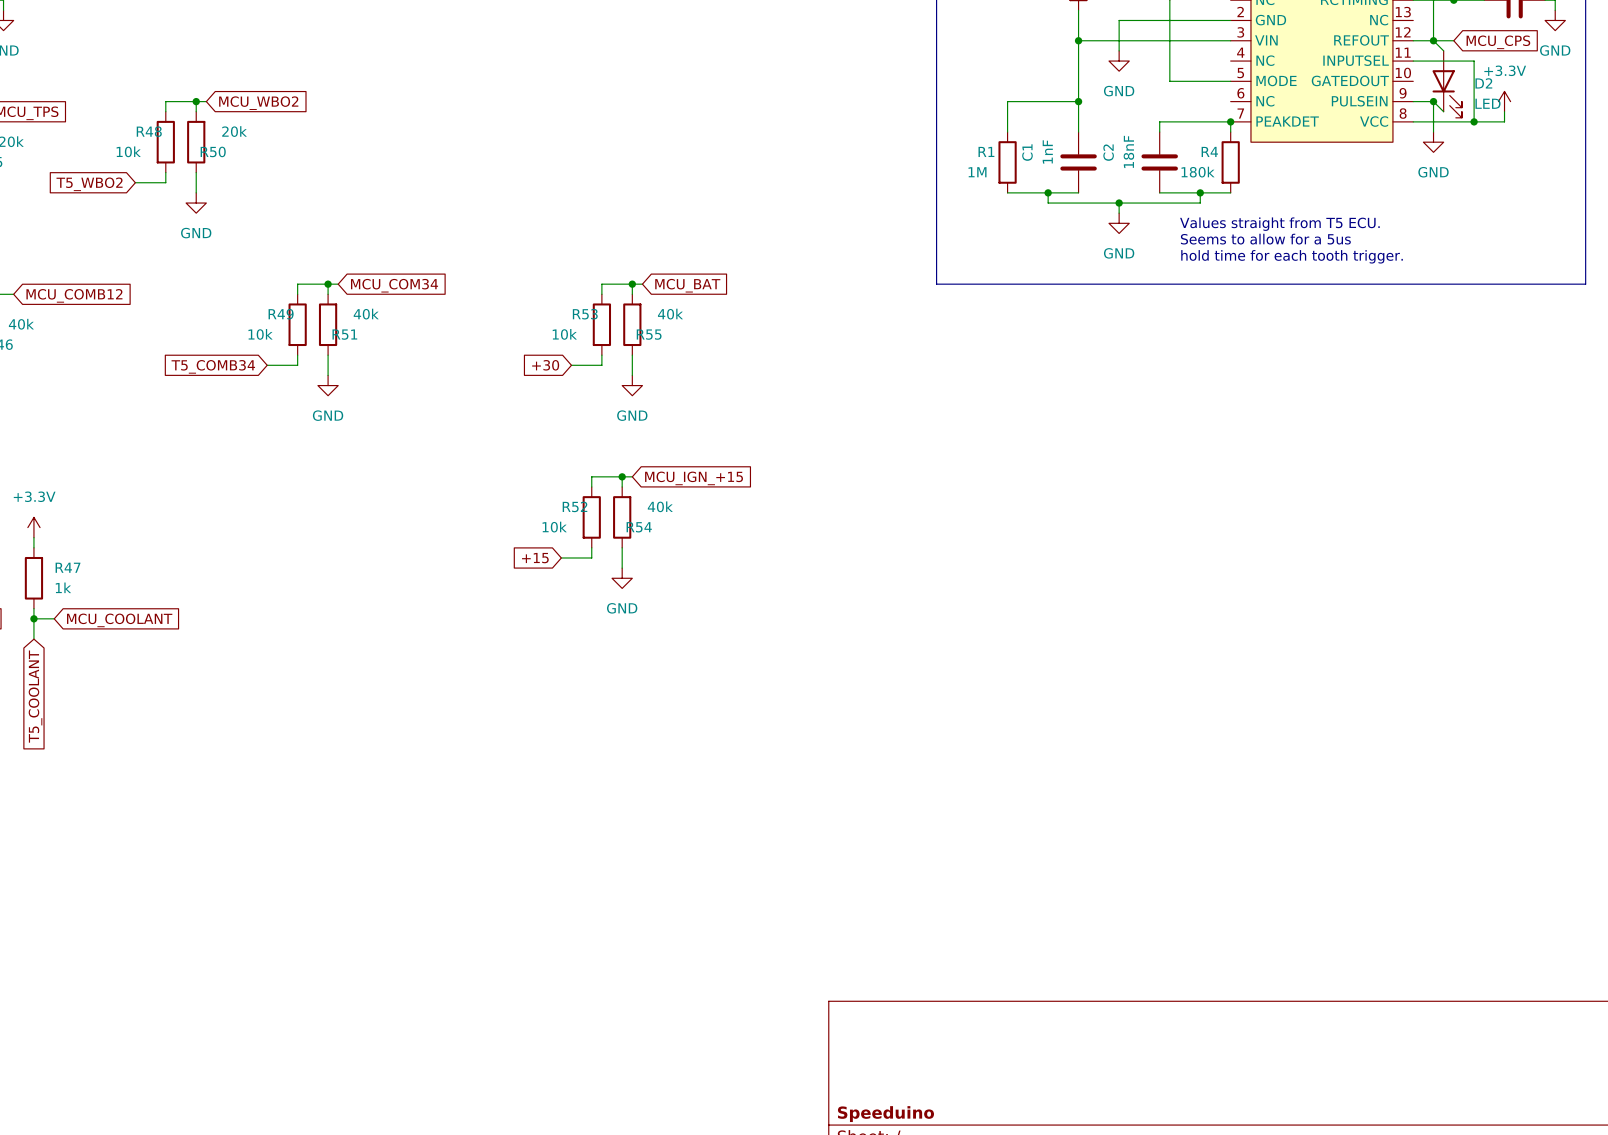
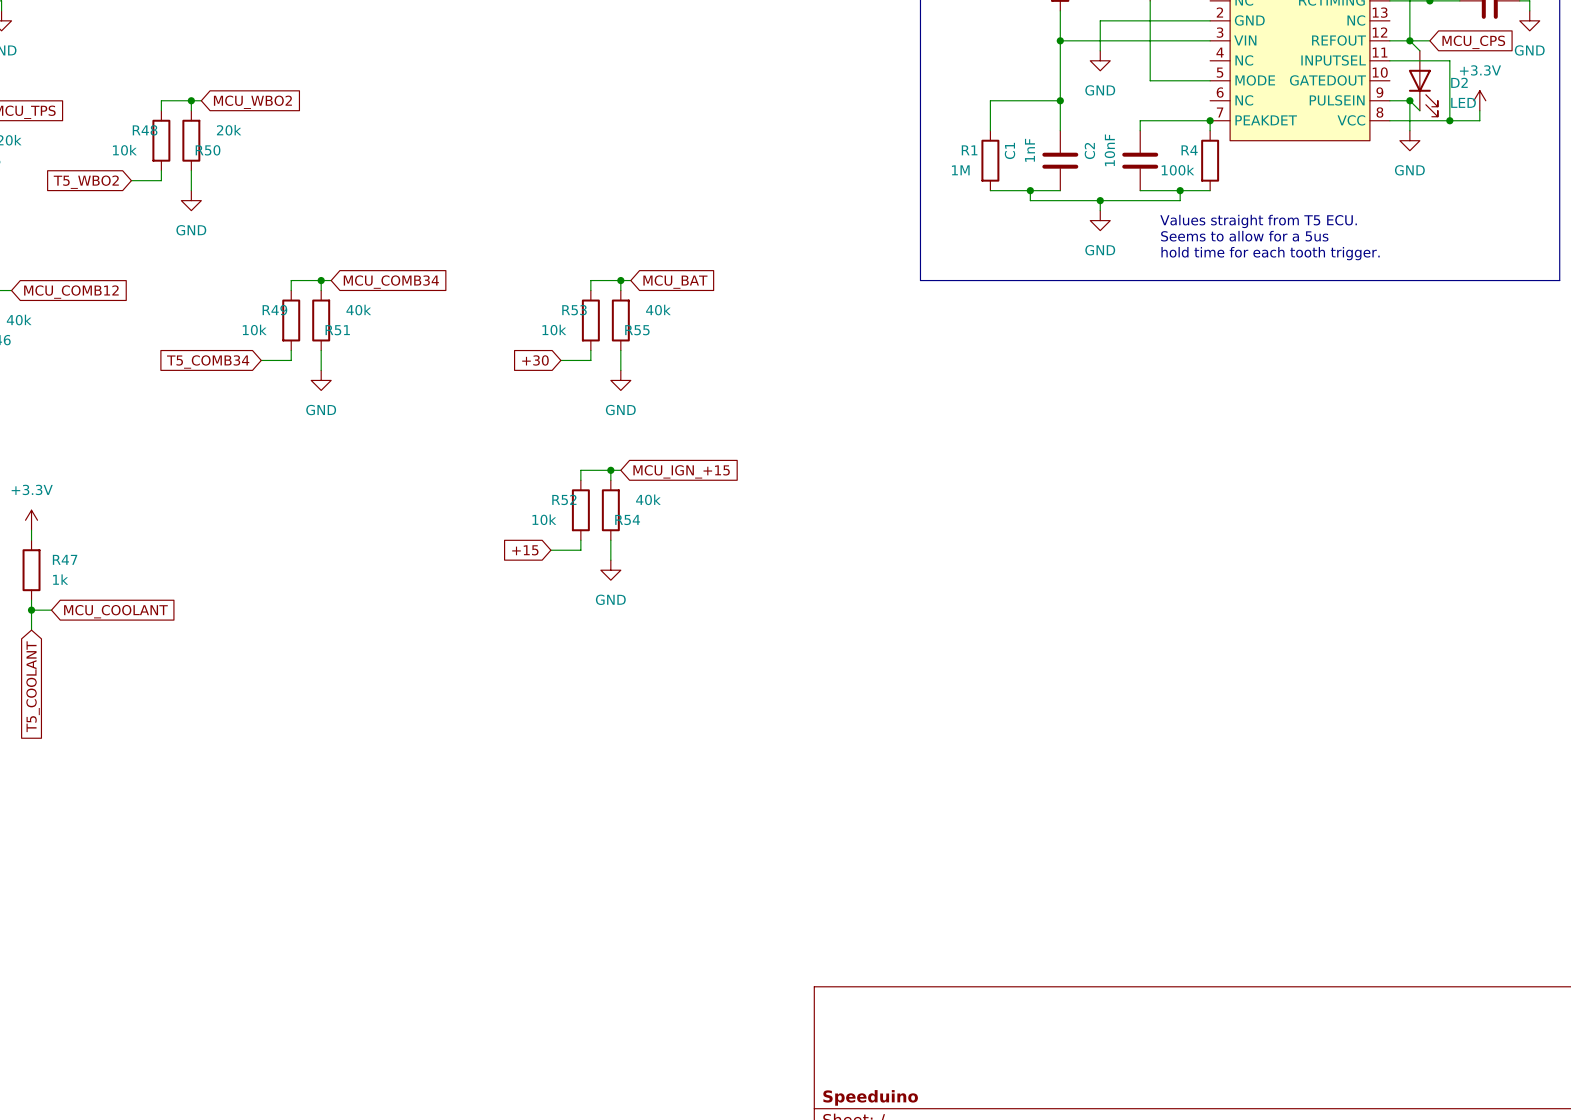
C2 value: 18nF (1128, 151) -> 10nF (1109, 150)
R4 value: 180k (1198, 172) -> 100k (1177, 170)
global label: MCU_COM34 (394, 285) -> MCU_COMB34 (391, 282)

